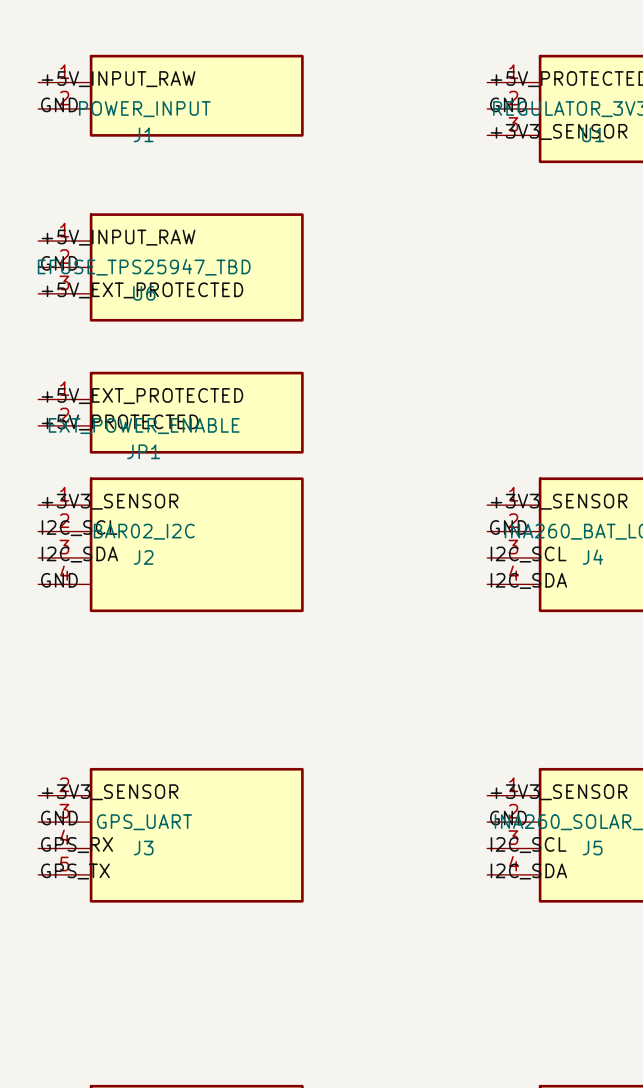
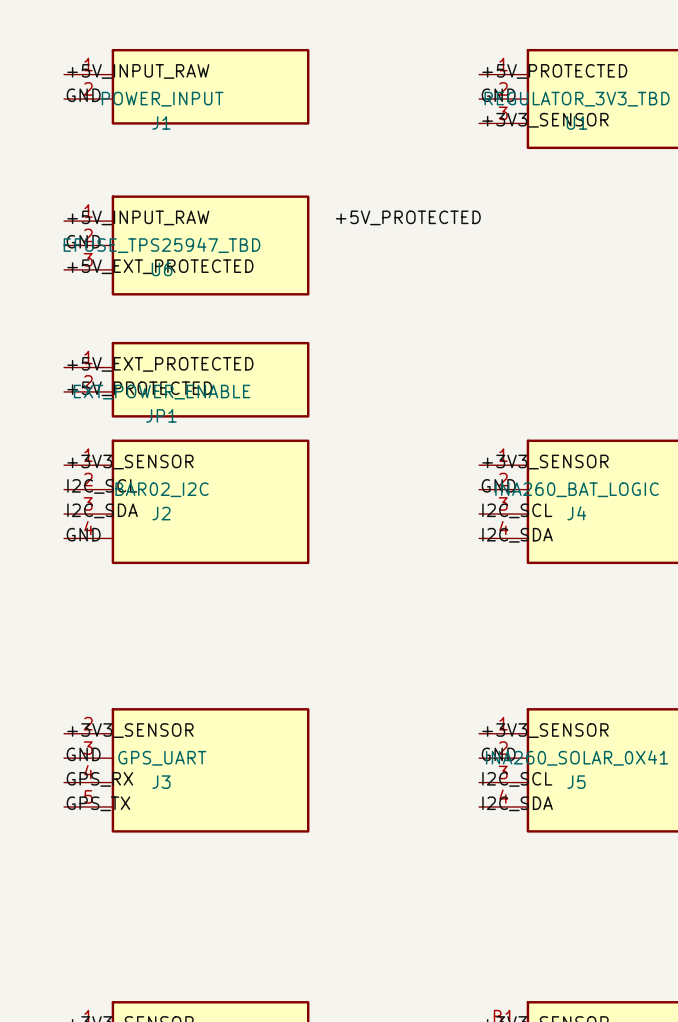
label: none -> +5V_PROTECTED (408, 217)

